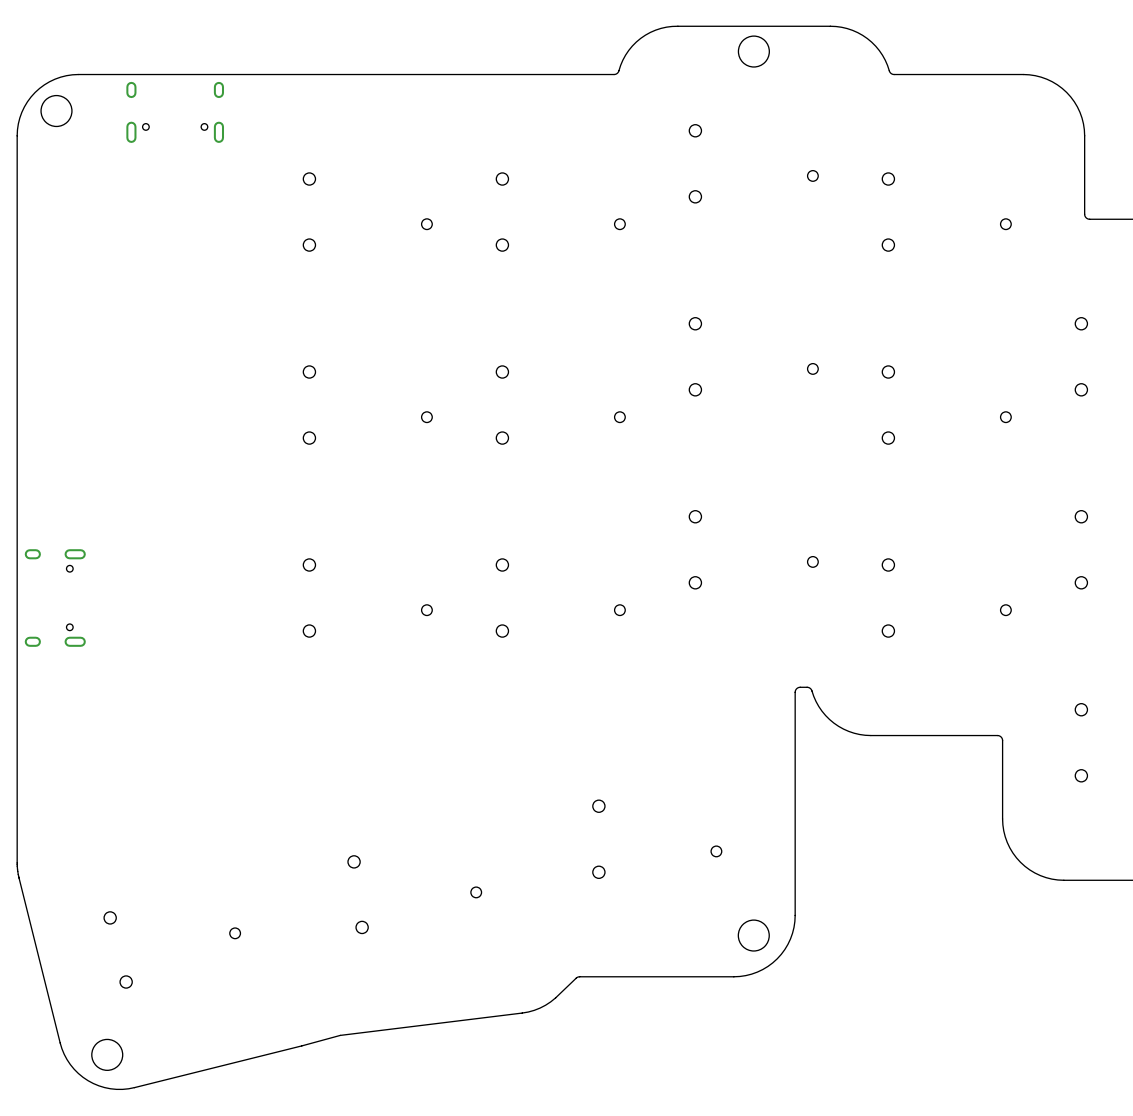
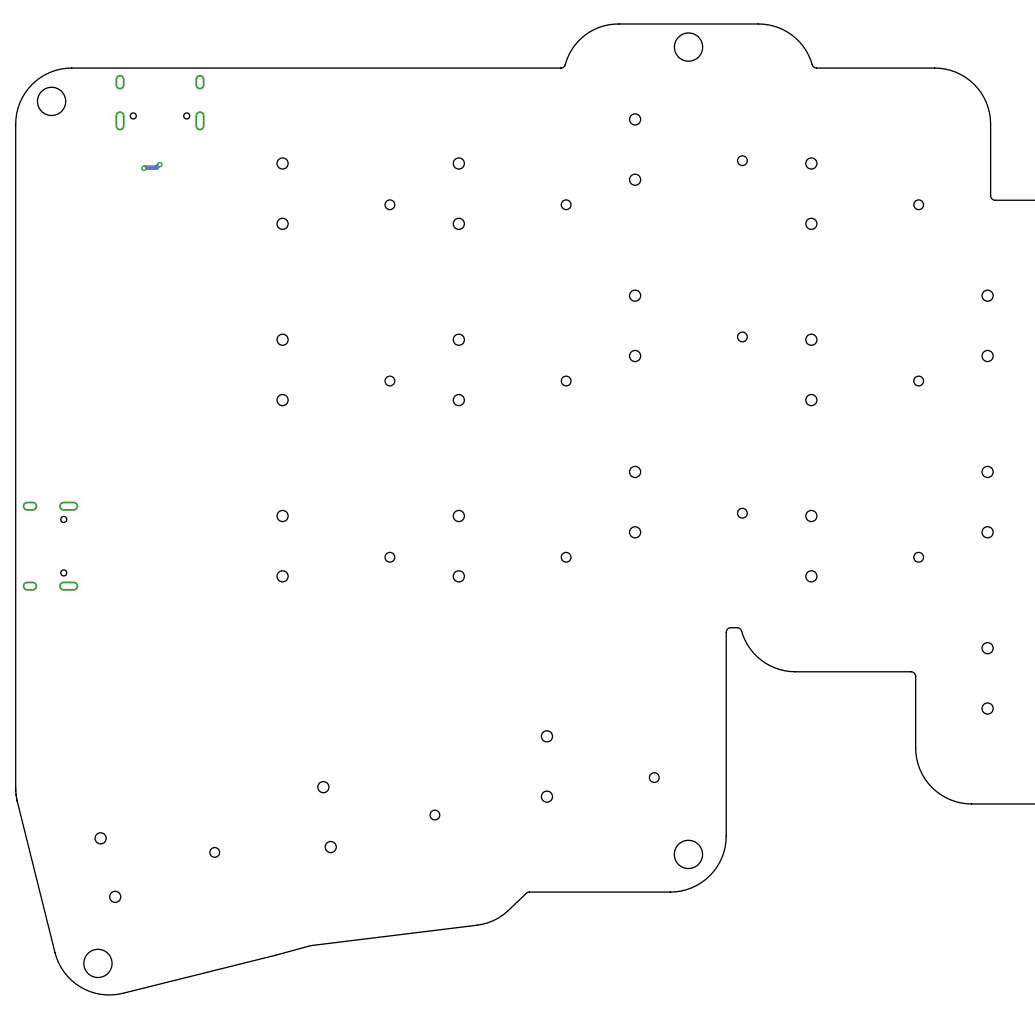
track: none -> (159, 164) (156, 167) (143, 168)
via: none -> (159, 164)
via: none -> (143, 168)

